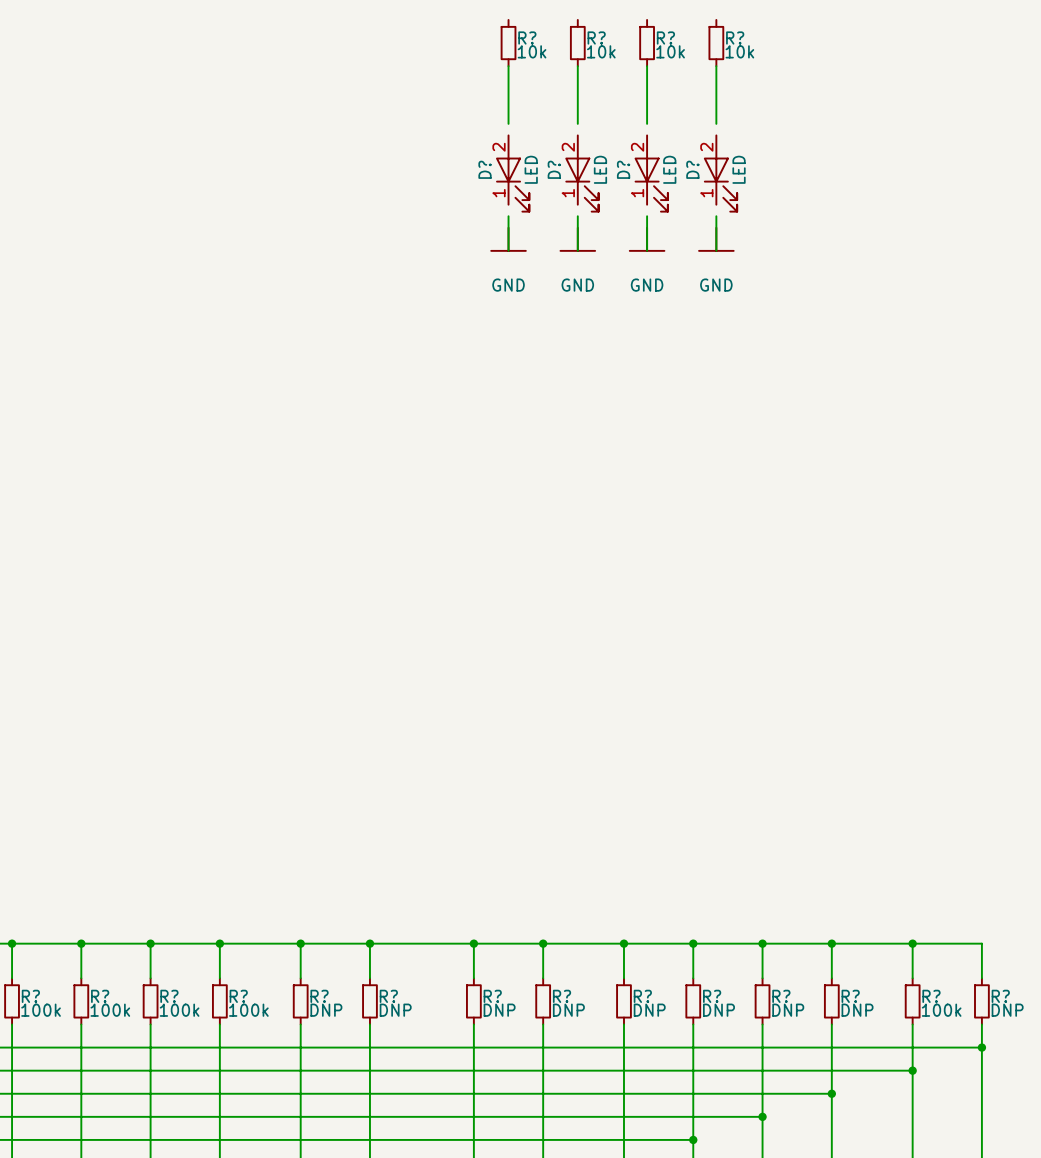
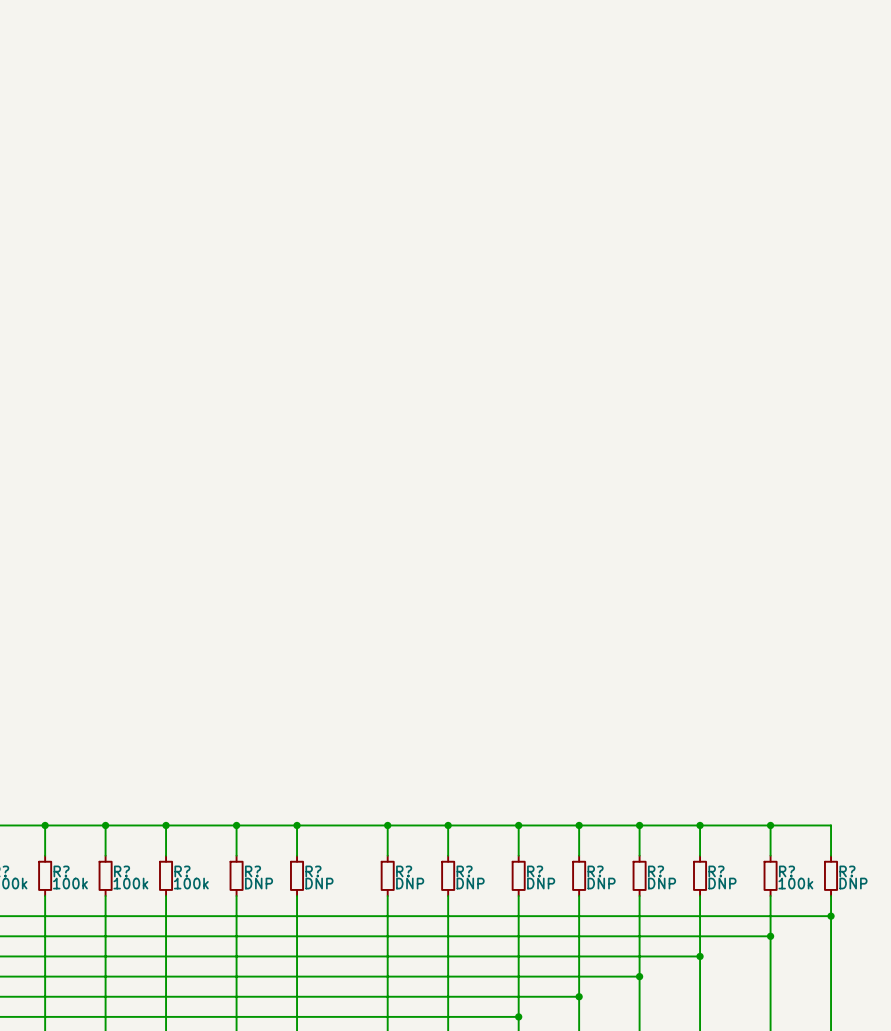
R?: 10k (508, 43) -> none
R?: 10k (577, 43) -> none
R?: 10k (647, 43) -> none
R?: 10k (716, 43) -> none
wire: (508, 66) (508, 123) -> none
wire: (577, 66) (577, 123) -> none
wire: (647, 66) (647, 123) -> none
wire: (716, 66) (716, 123) -> none
D?: LED (512, 173) -> none
D?: LED (581, 173) -> none
D?: LED (651, 173) -> none
D?: LED (720, 173) -> none
wire: (508, 216) (508, 250) -> none
wire: (577, 216) (577, 250) -> none
wire: (647, 216) (647, 250) -> none
wire: (716, 216) (716, 250) -> none
power symbol: GND (508, 239) -> none
power symbol: GND (577, 239) -> none
power symbol: GND (647, 239) -> none
power symbol: GND (716, 239) -> none

